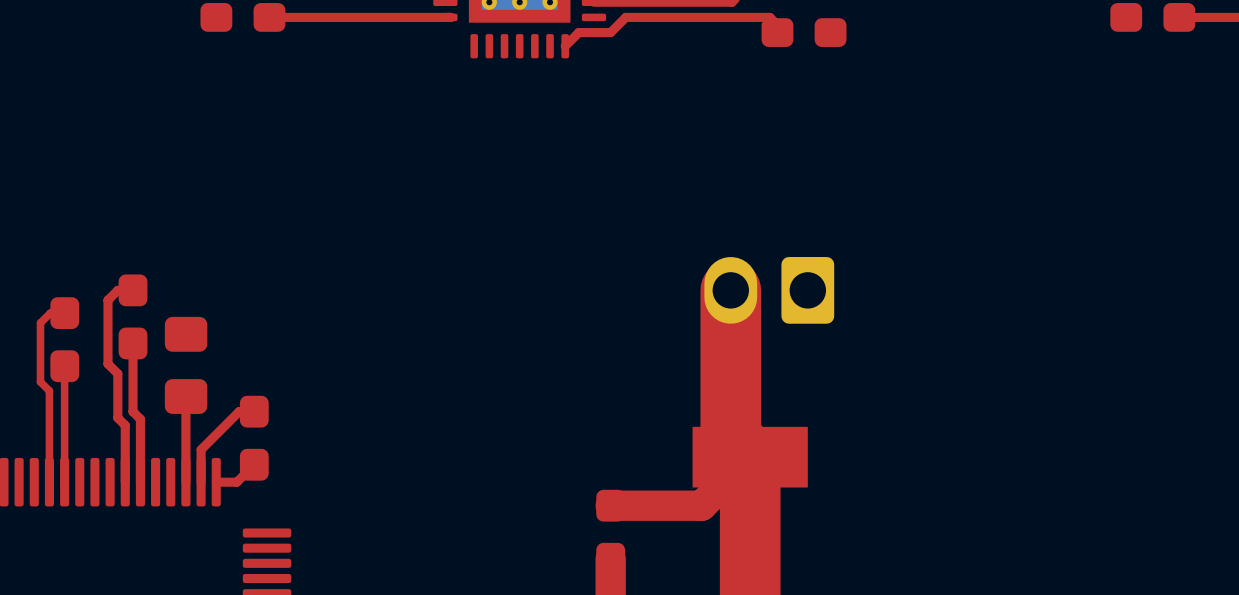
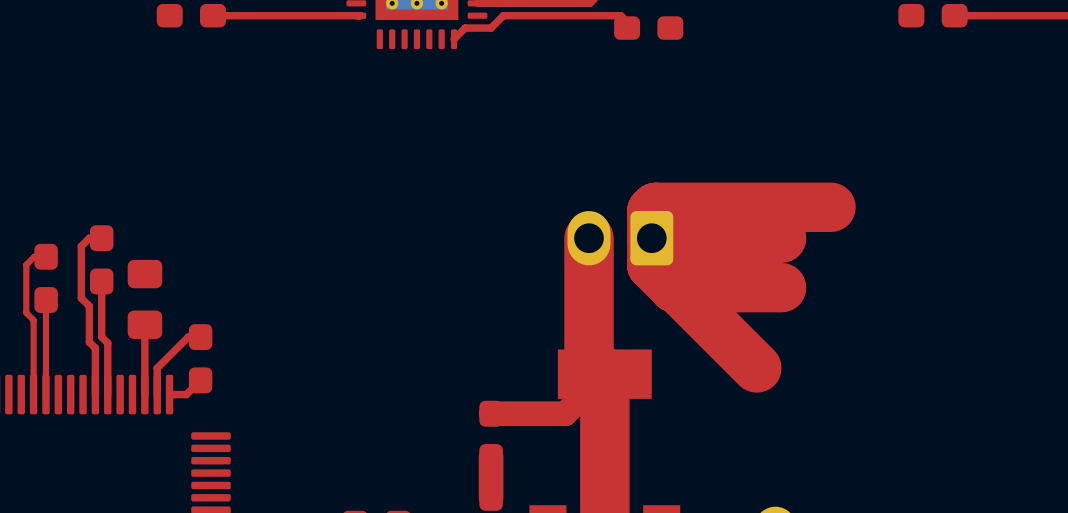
top track: none -> (831, 207) (655, 207) (651, 211) (651, 265) (674, 287) (781, 287)
top track: none -> (781, 238) (651, 238)
top track: none -> (676, 287) (756, 368)

